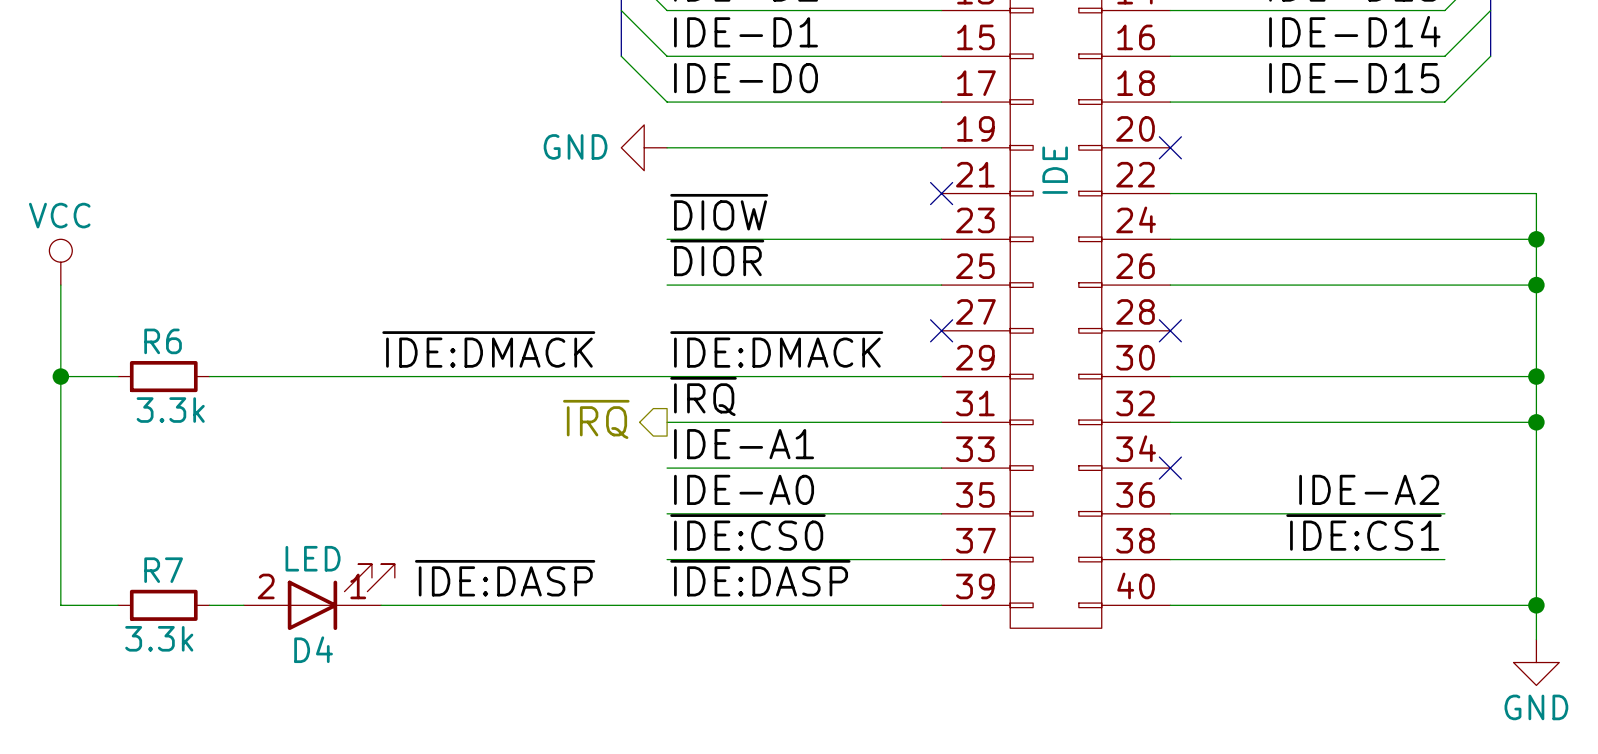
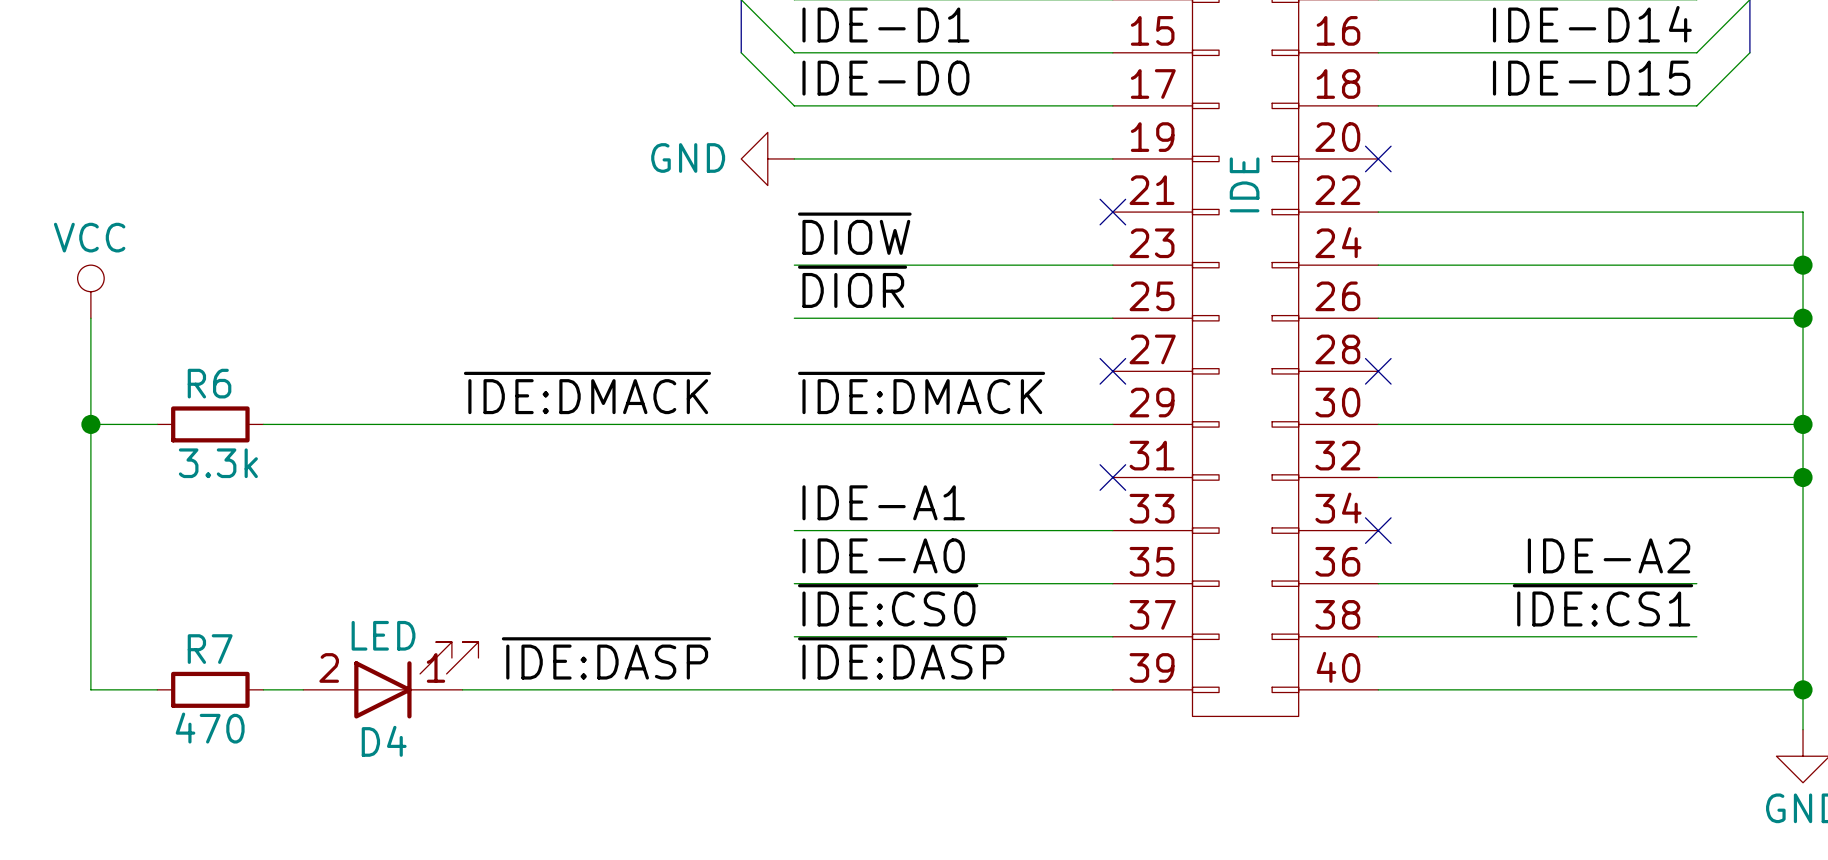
label: ~{IRQ} (703, 396) -> none
hierarchical label: ~{IRQ} (596, 419) -> none
wire: (667, 422) (941, 422) -> none
no-connect mark: none -> (1112, 477)
R7 value: 3.3k (159, 638) -> 470 (210, 728)

